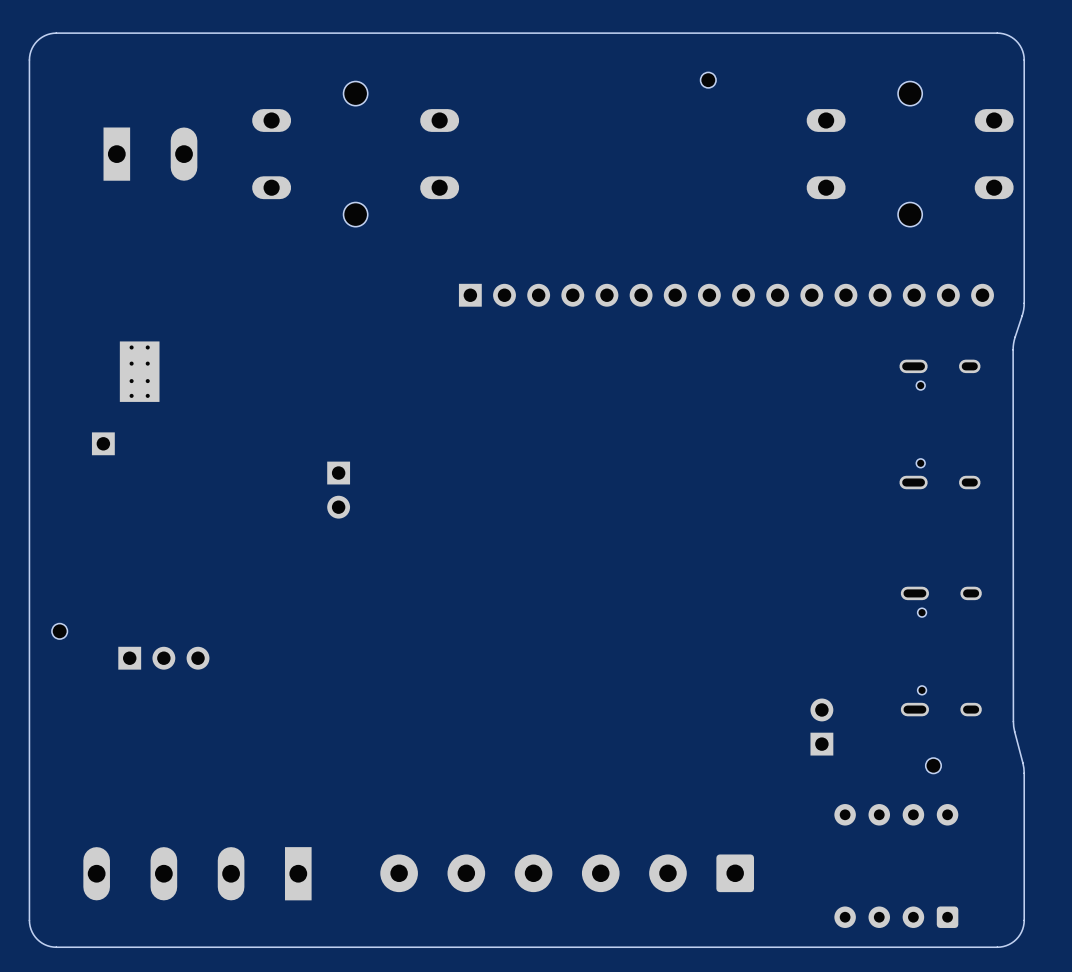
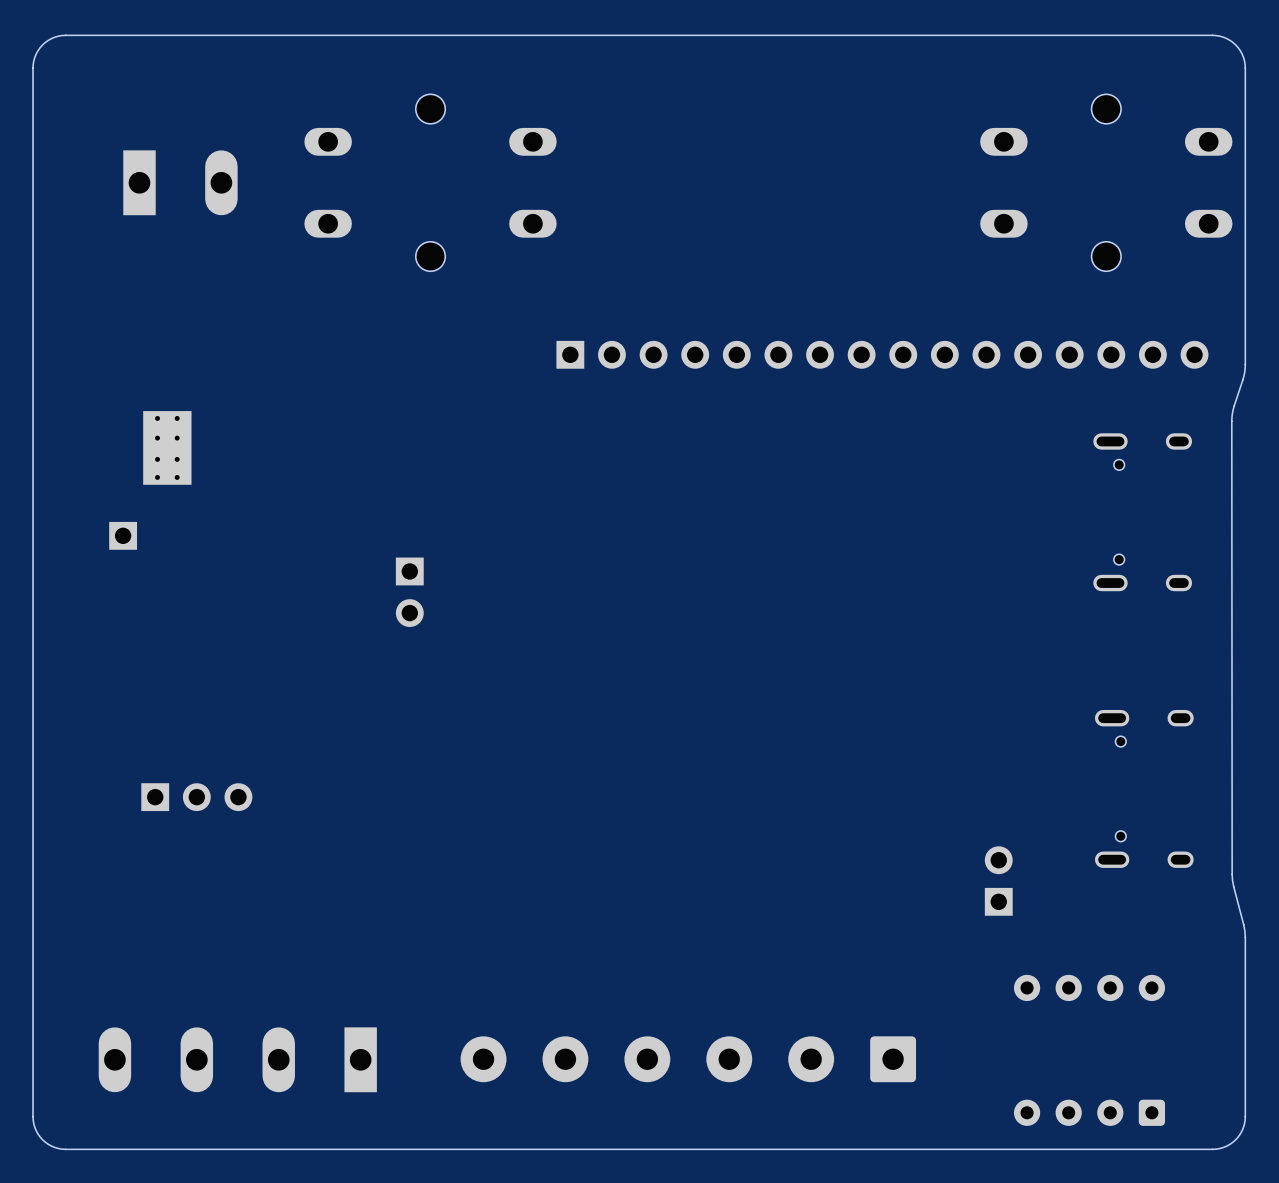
part: (708, 80) -> none
part: (59, 631) -> none
part: (933, 765) -> none

